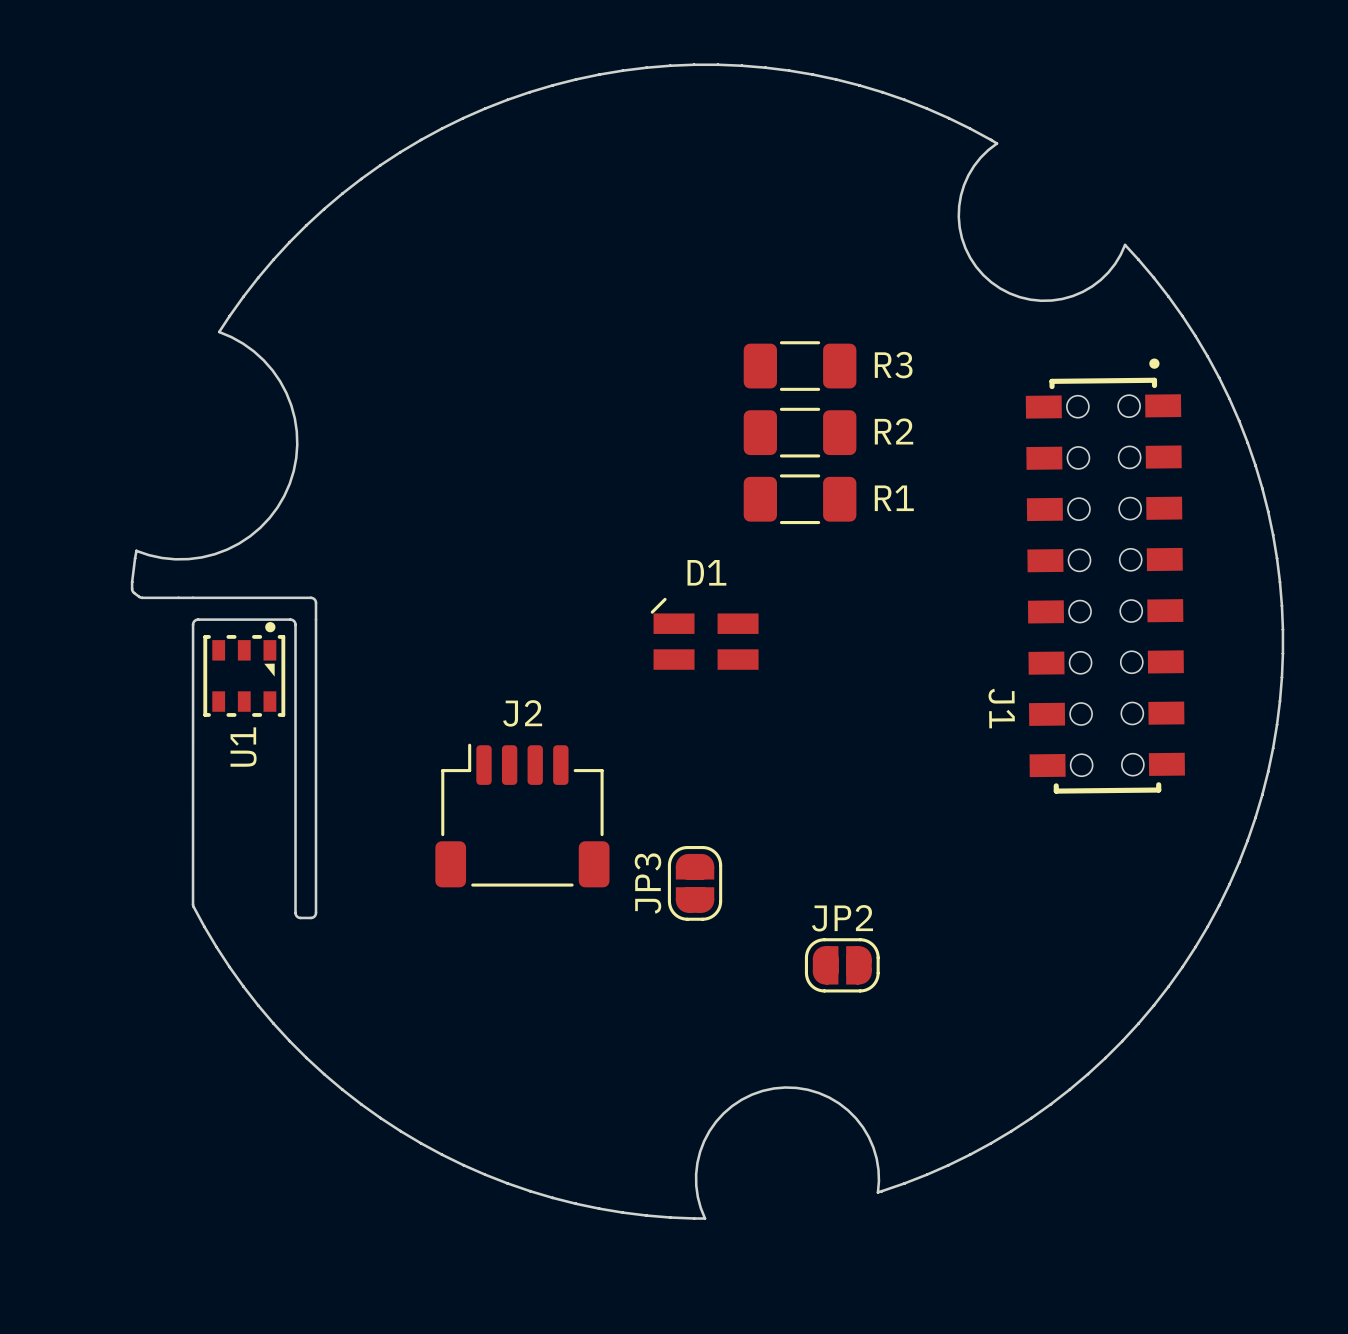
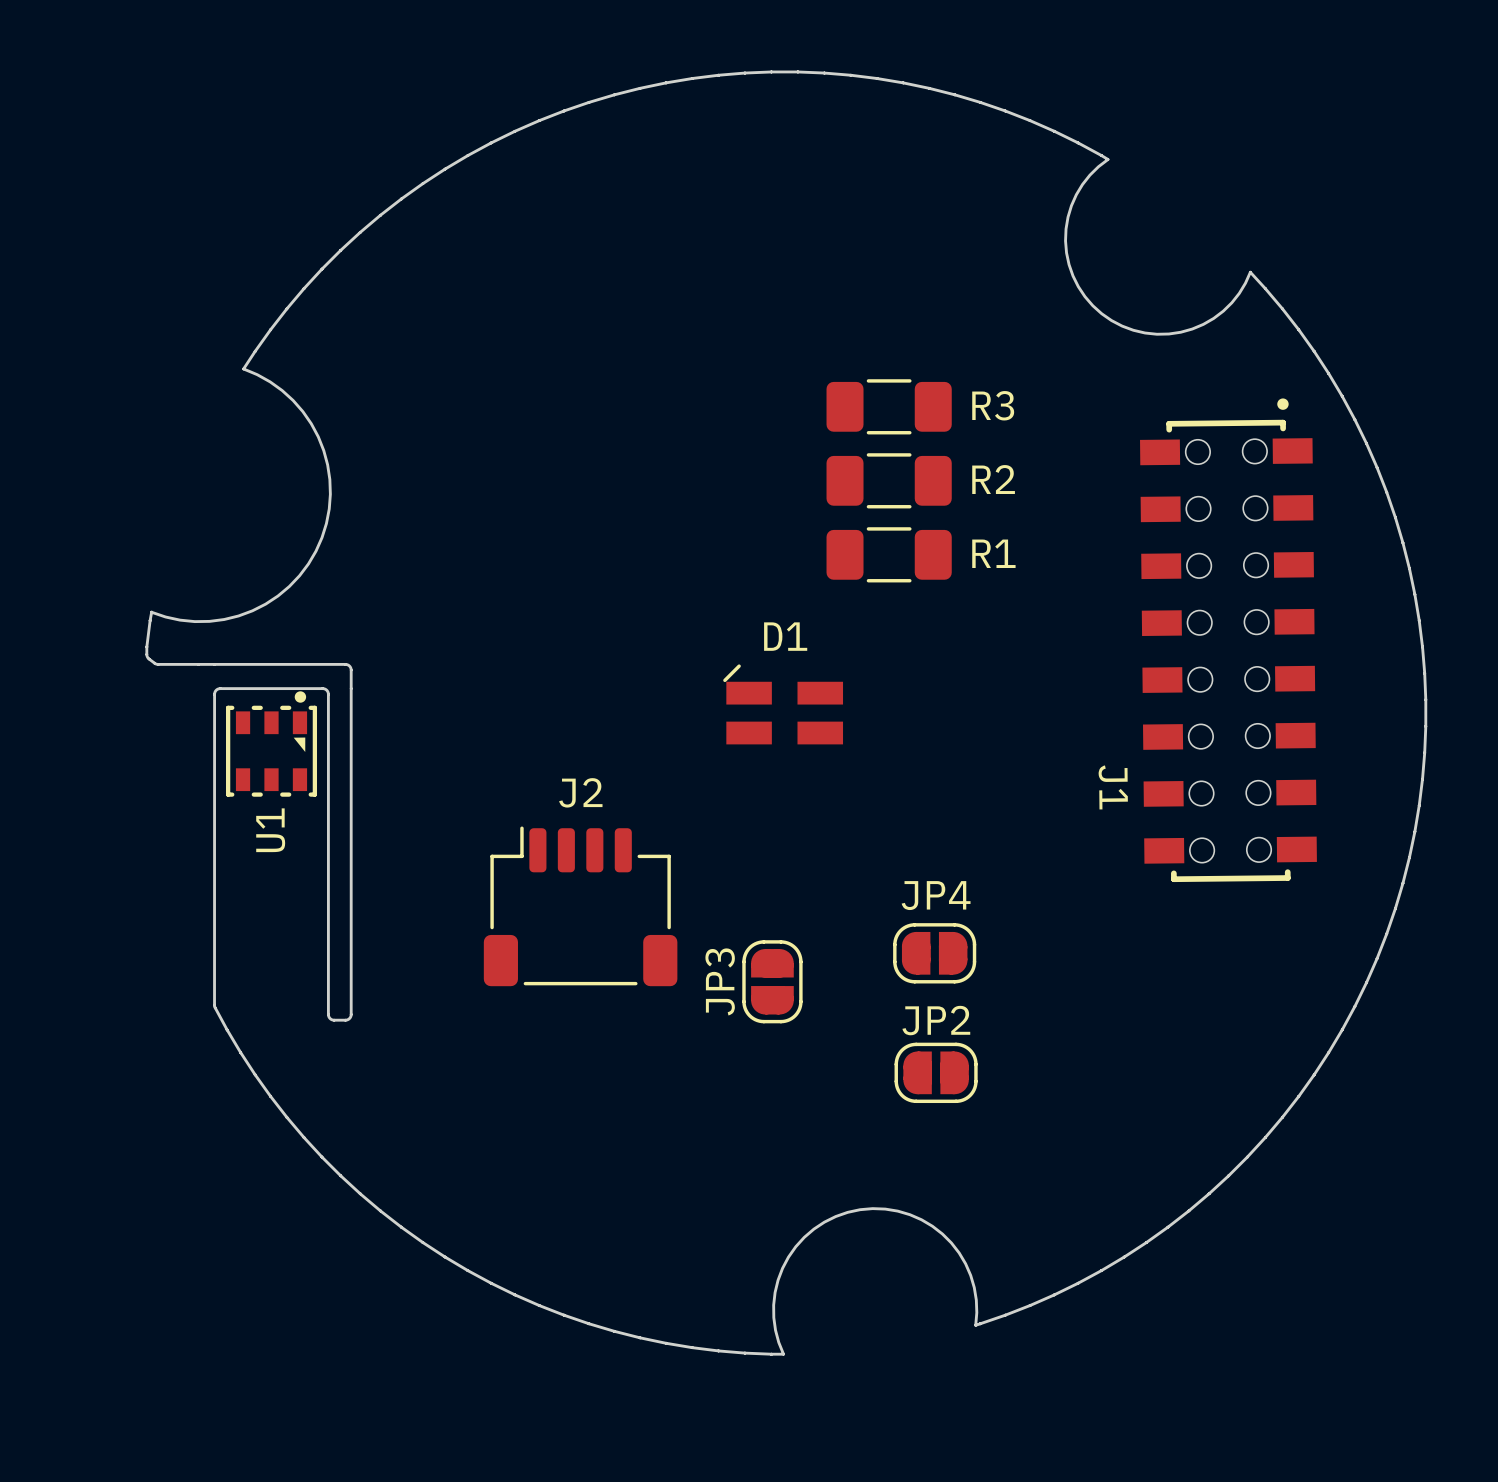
JP4: none -> (934, 953)

